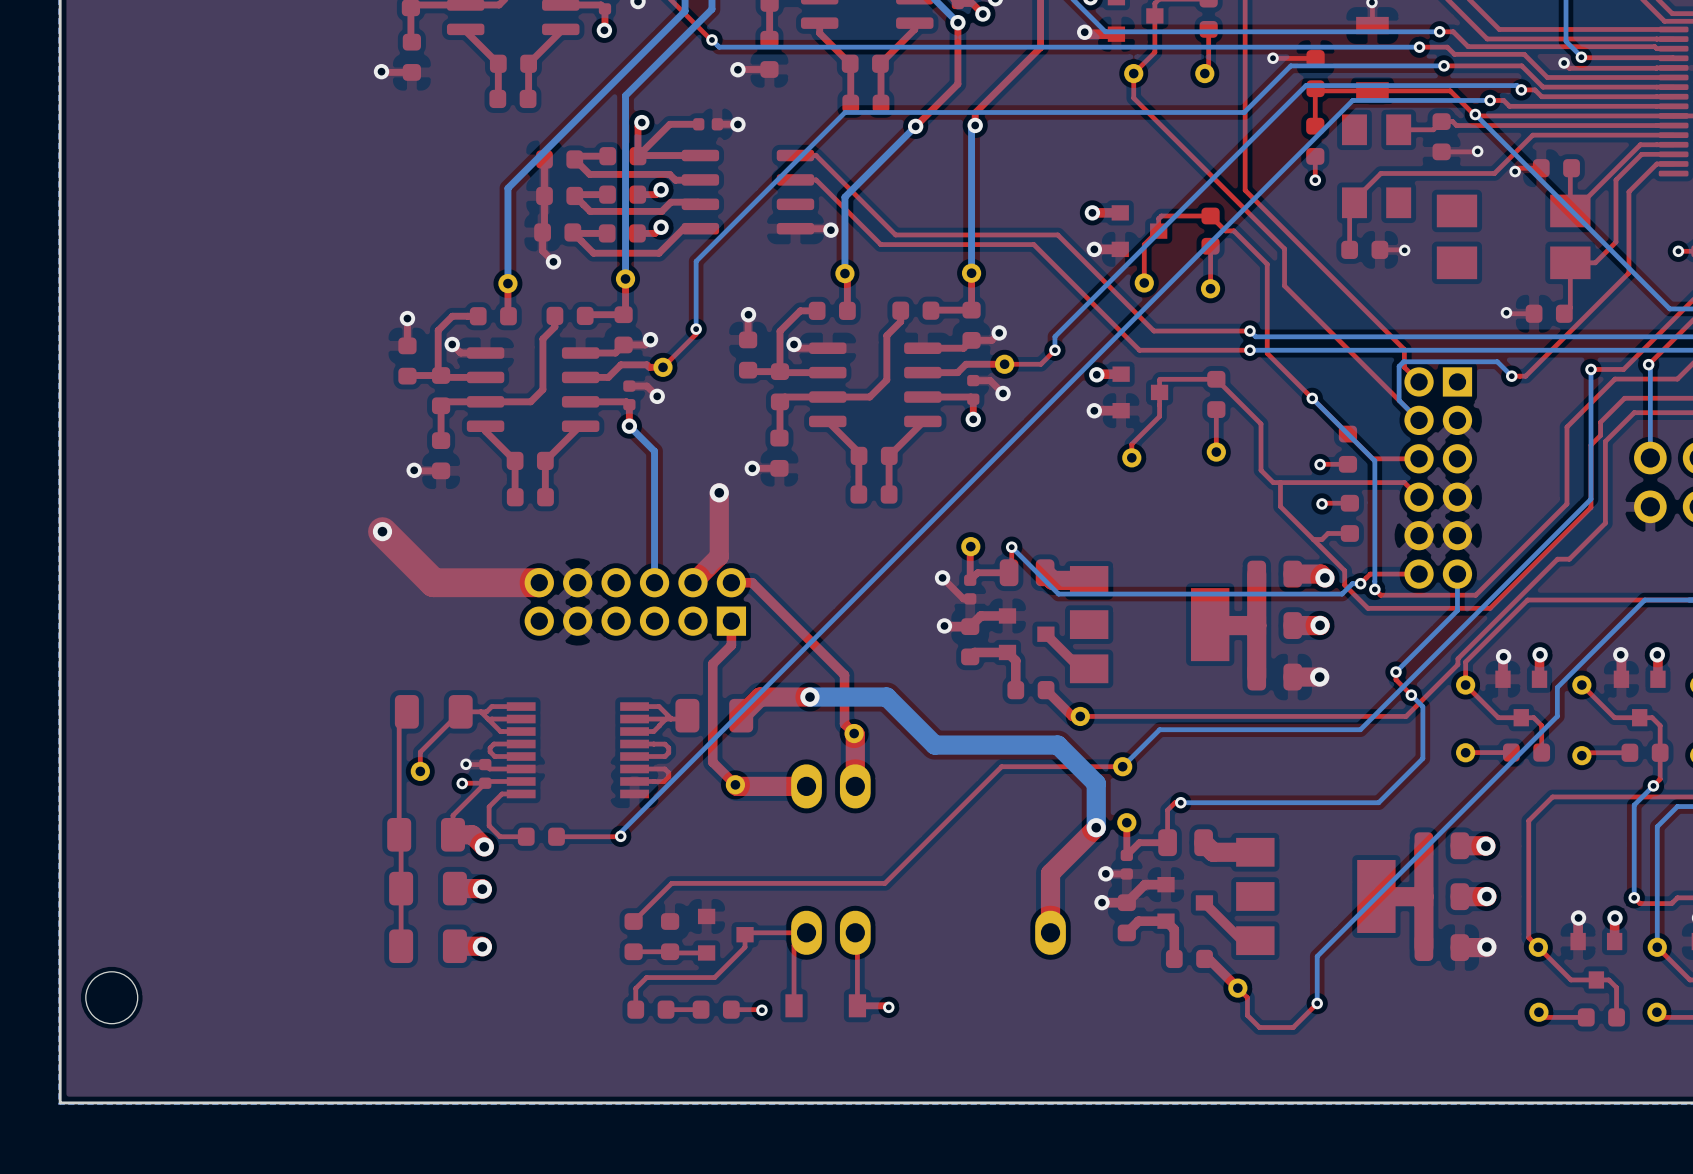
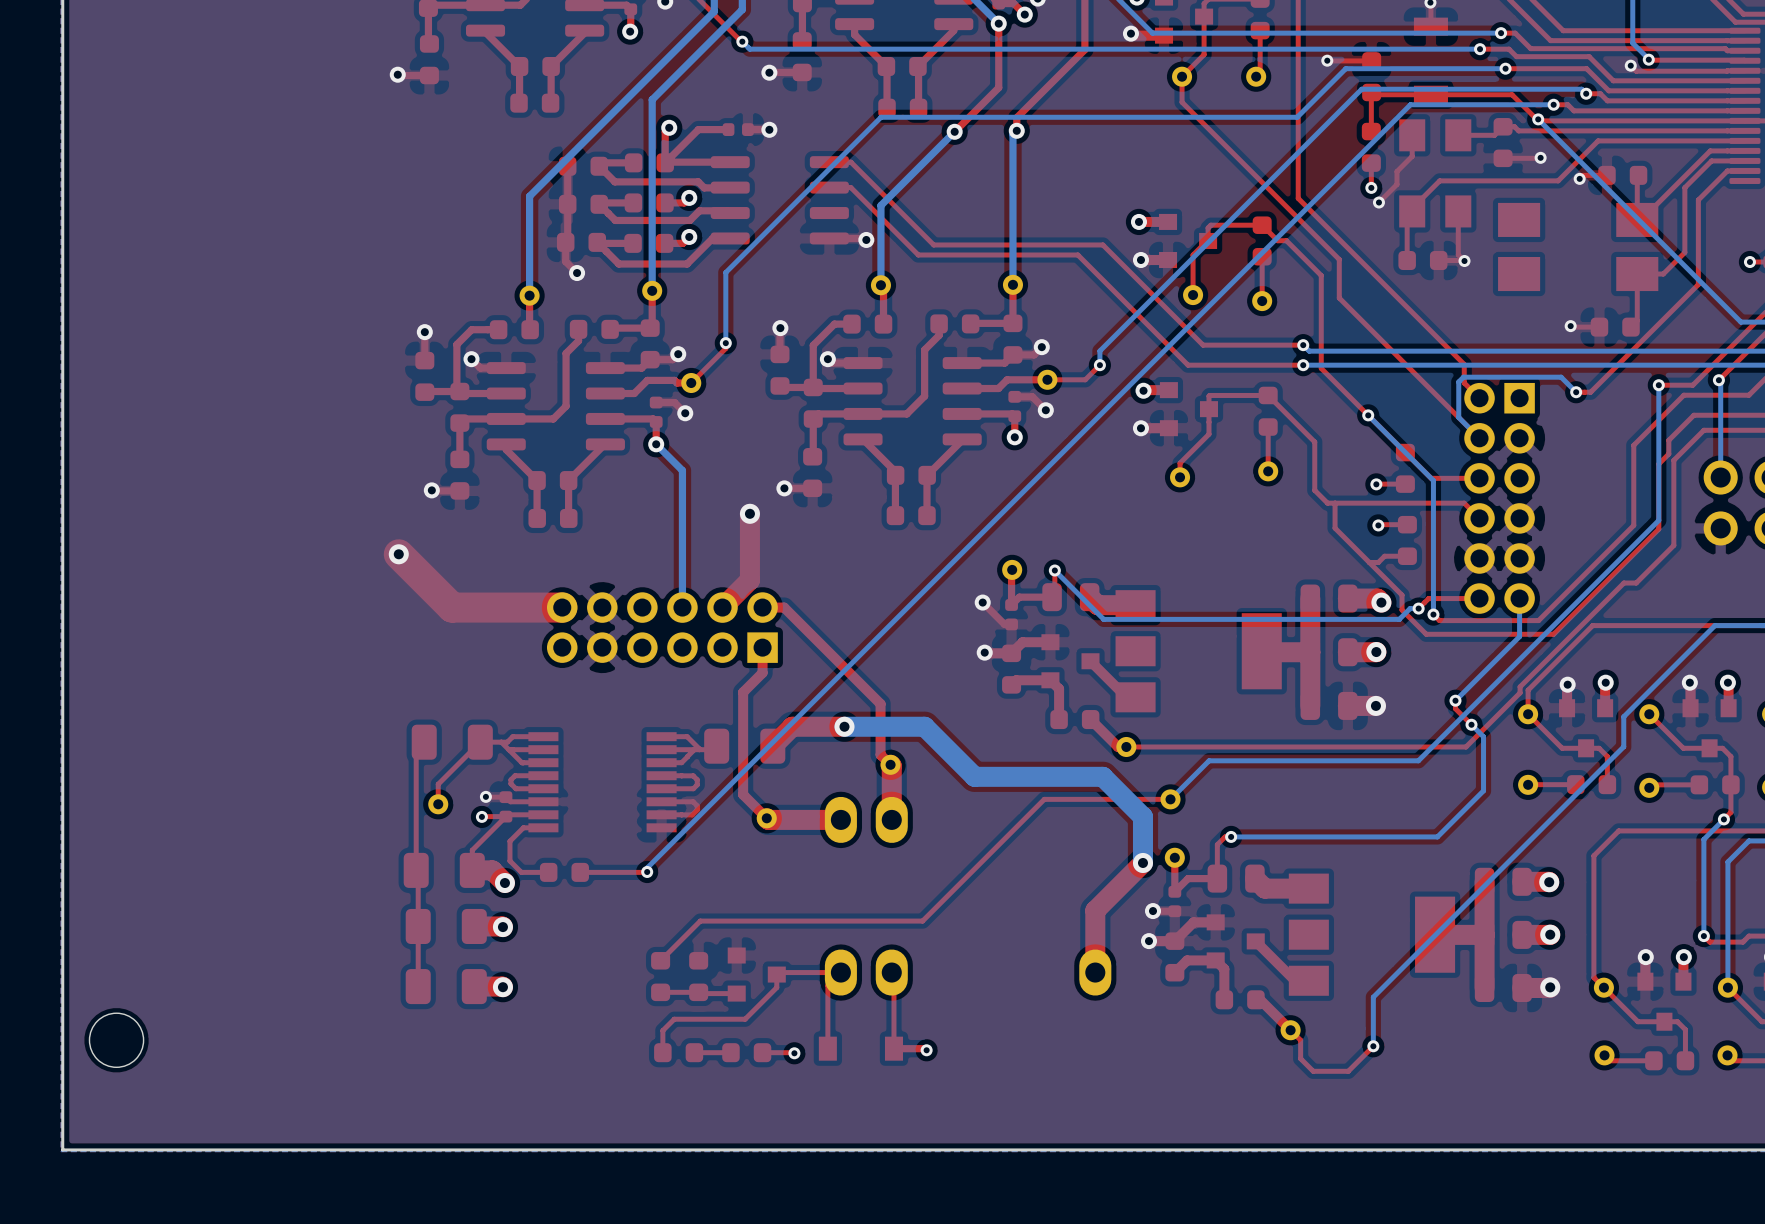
top track: none -> (1412, 135) (1412, 156) (1396, 171) (1396, 184) (1378, 202)
via: none -> (1378, 202)
top track: none -> (1458, 211) (1458, 254) (1464, 260)

